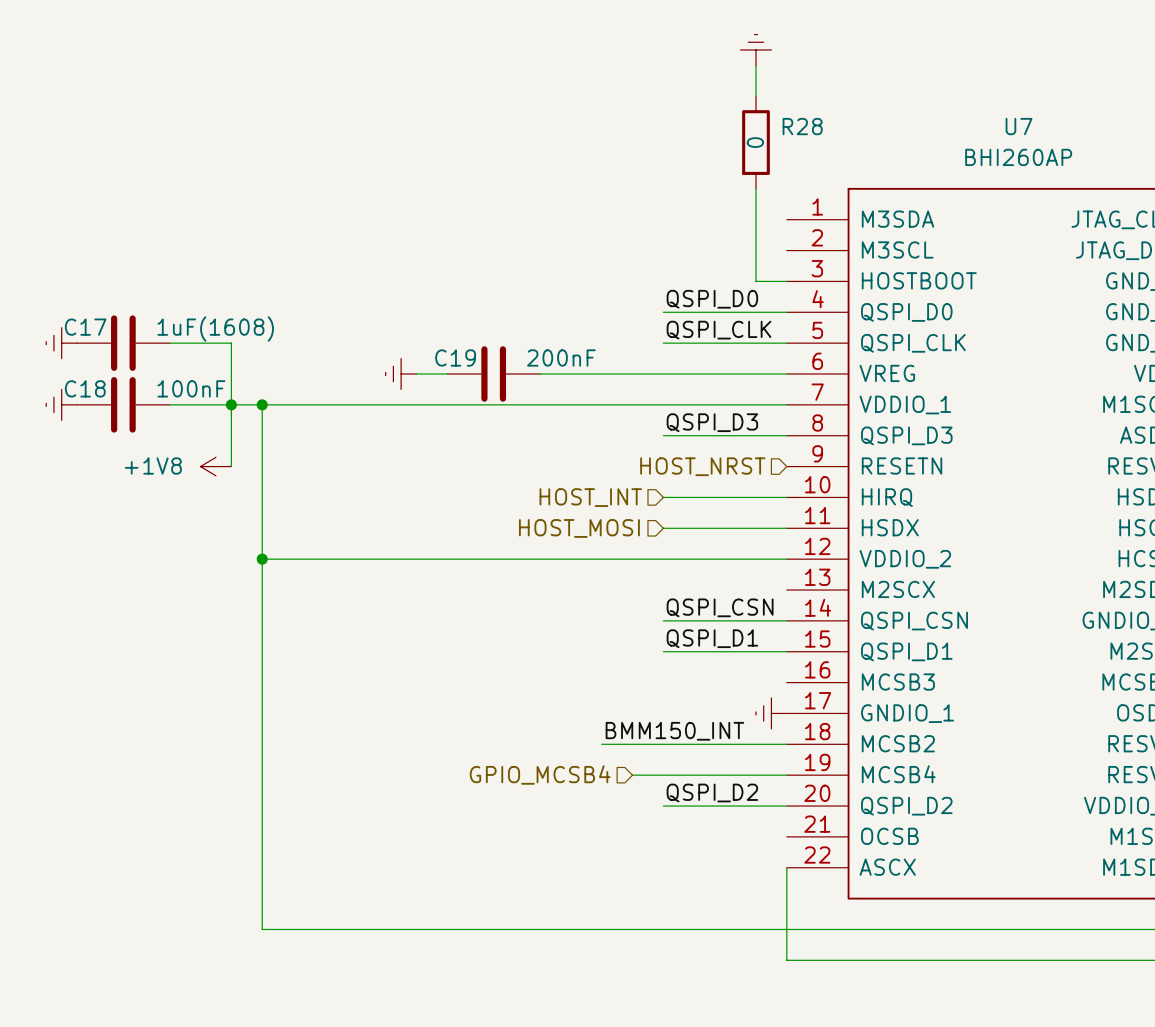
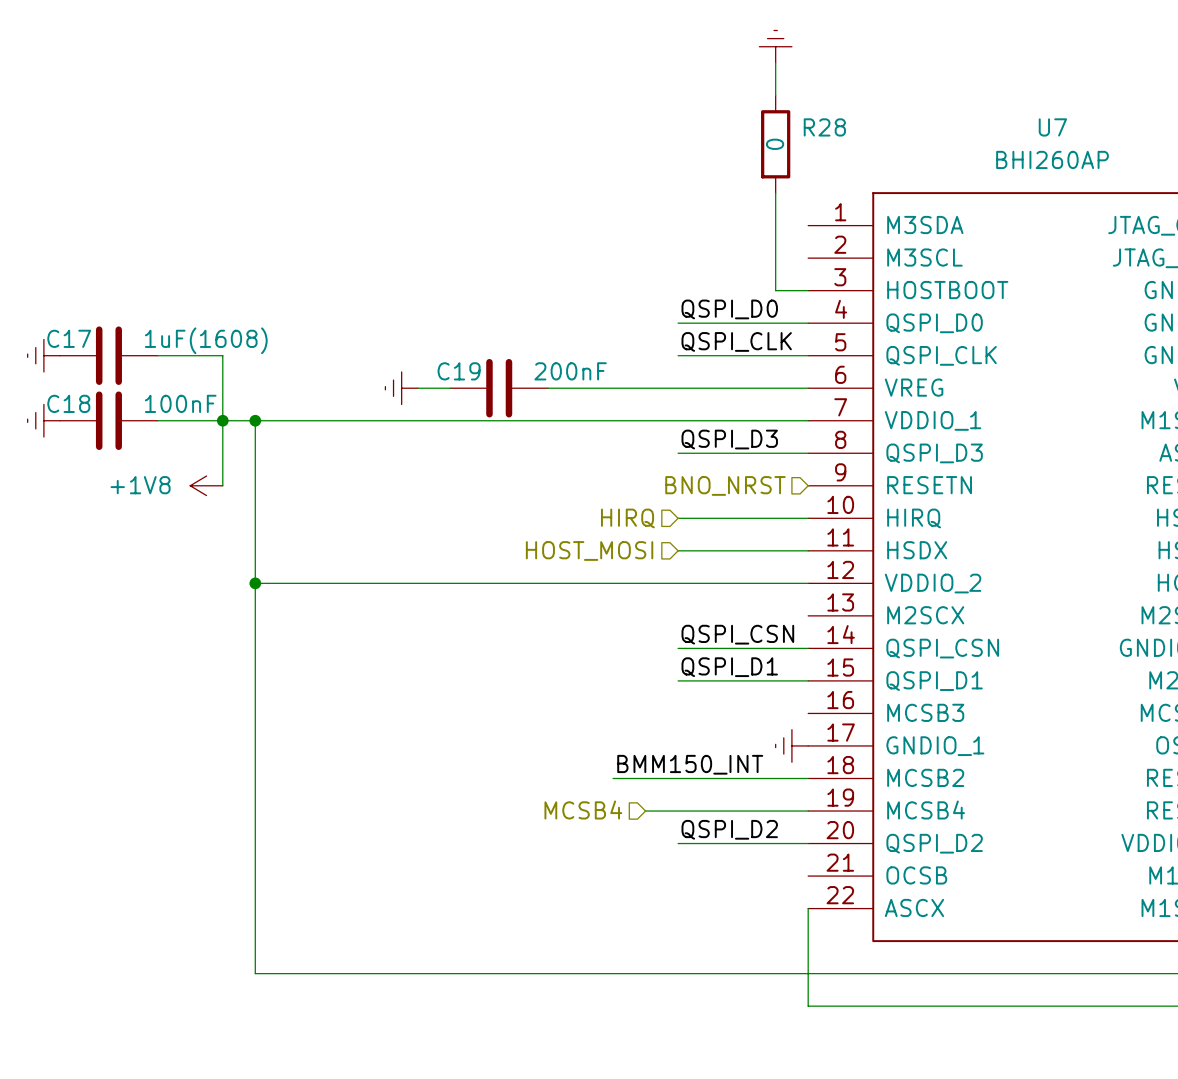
hierarchical label: HOST_NRST (702, 466) -> BNO_NRST (725, 485)
hierarchical label: HOST_INT (590, 497) -> HIRQ (627, 518)
hierarchical label: GPIO_MCSB4 (540, 774) -> MCSB4 (583, 810)

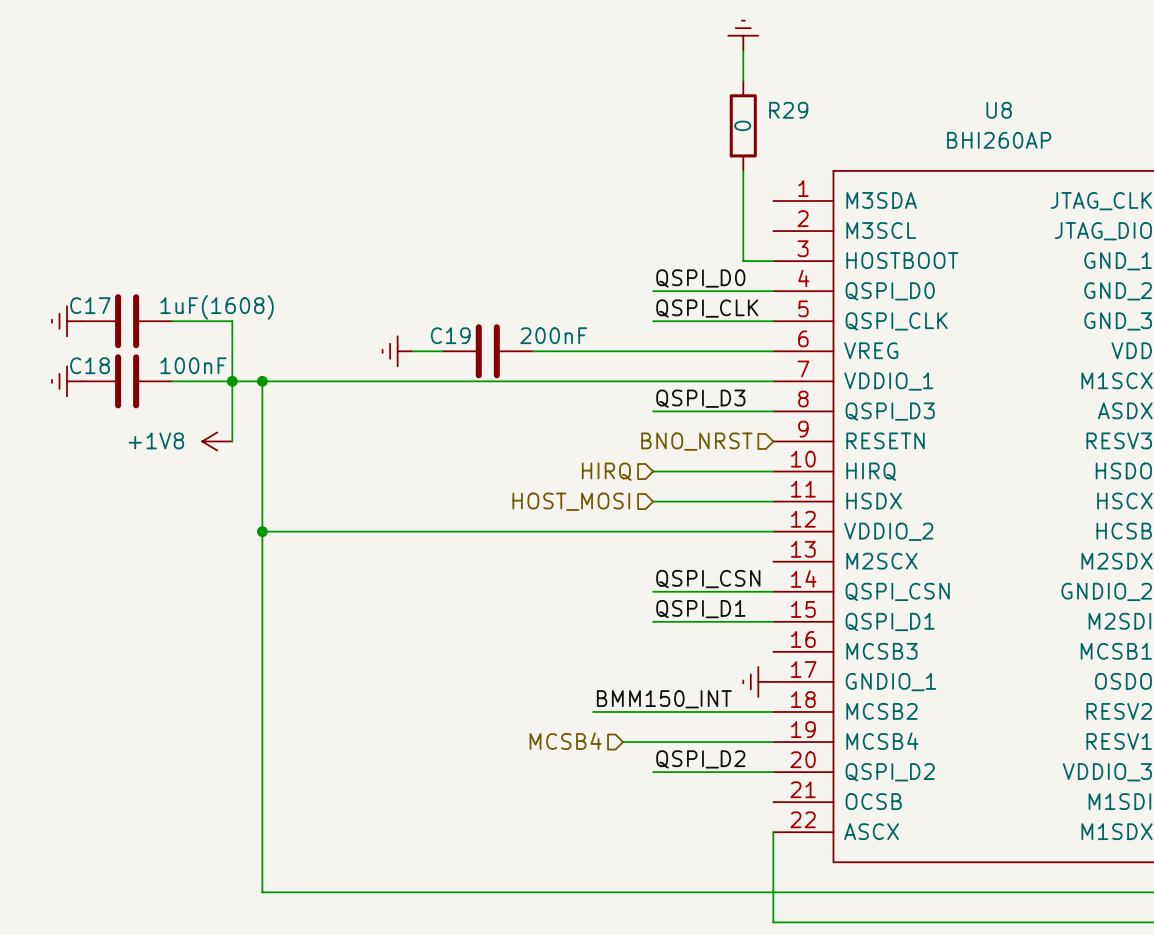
R28 name: R28 (824, 127) -> R29 (788, 110)
U7 name: U7 (1052, 127) -> U8 (999, 110)

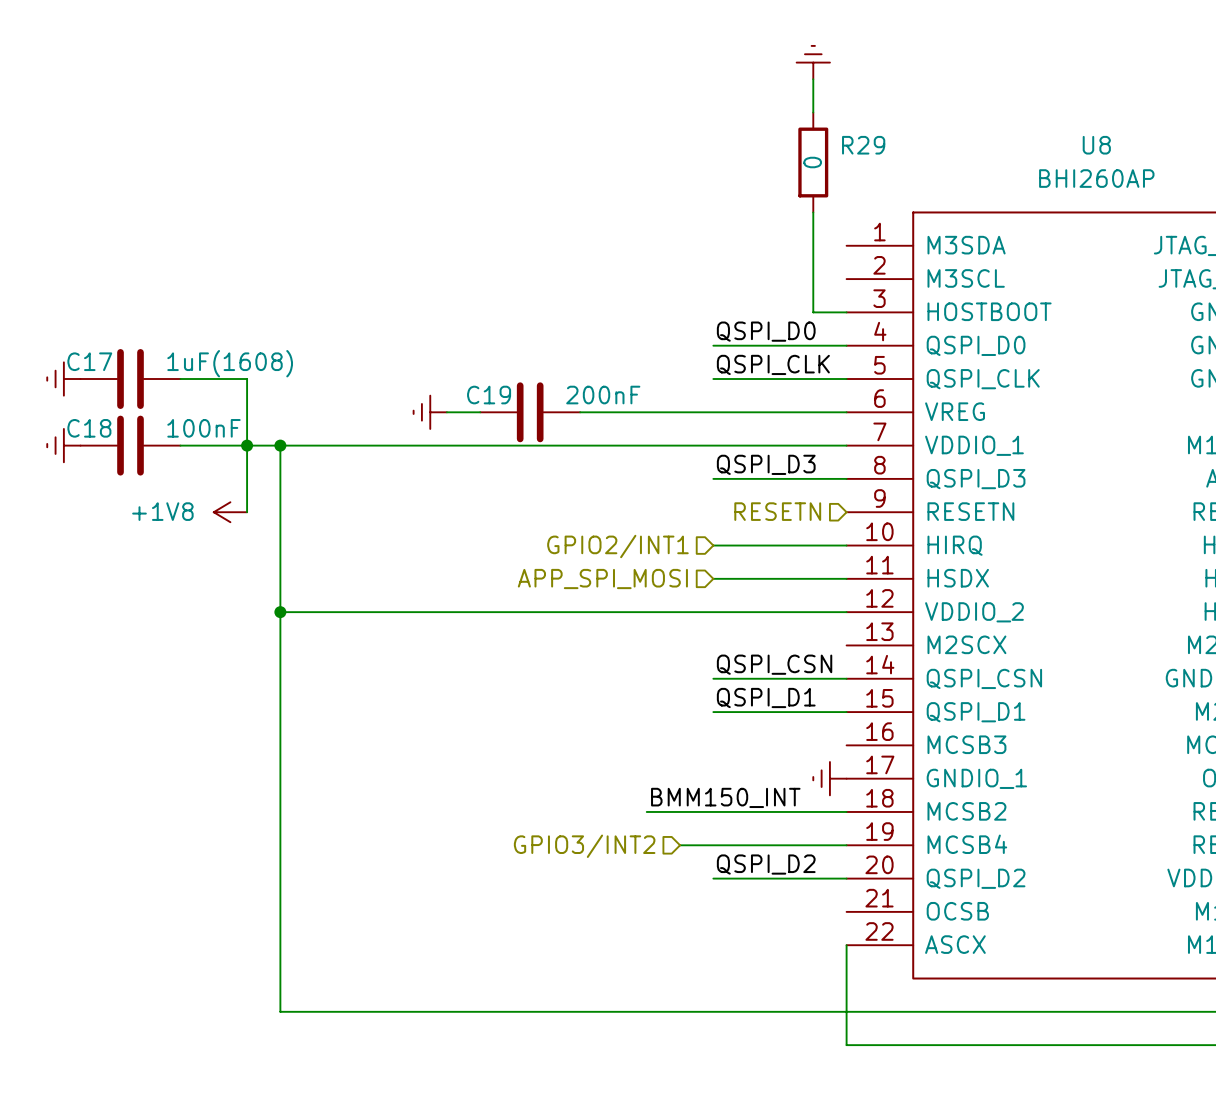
hierarchical label: BNO_NRST (696, 441) -> RESETN (777, 511)
hierarchical label: HIRQ (606, 471) -> GPIO2/INT1 (617, 546)
hierarchical label: HOST_MOSI (571, 501) -> APP_SPI_MOSI (602, 579)
hierarchical label: MCSB4 (565, 741) -> GPIO3/INT2 (584, 846)

